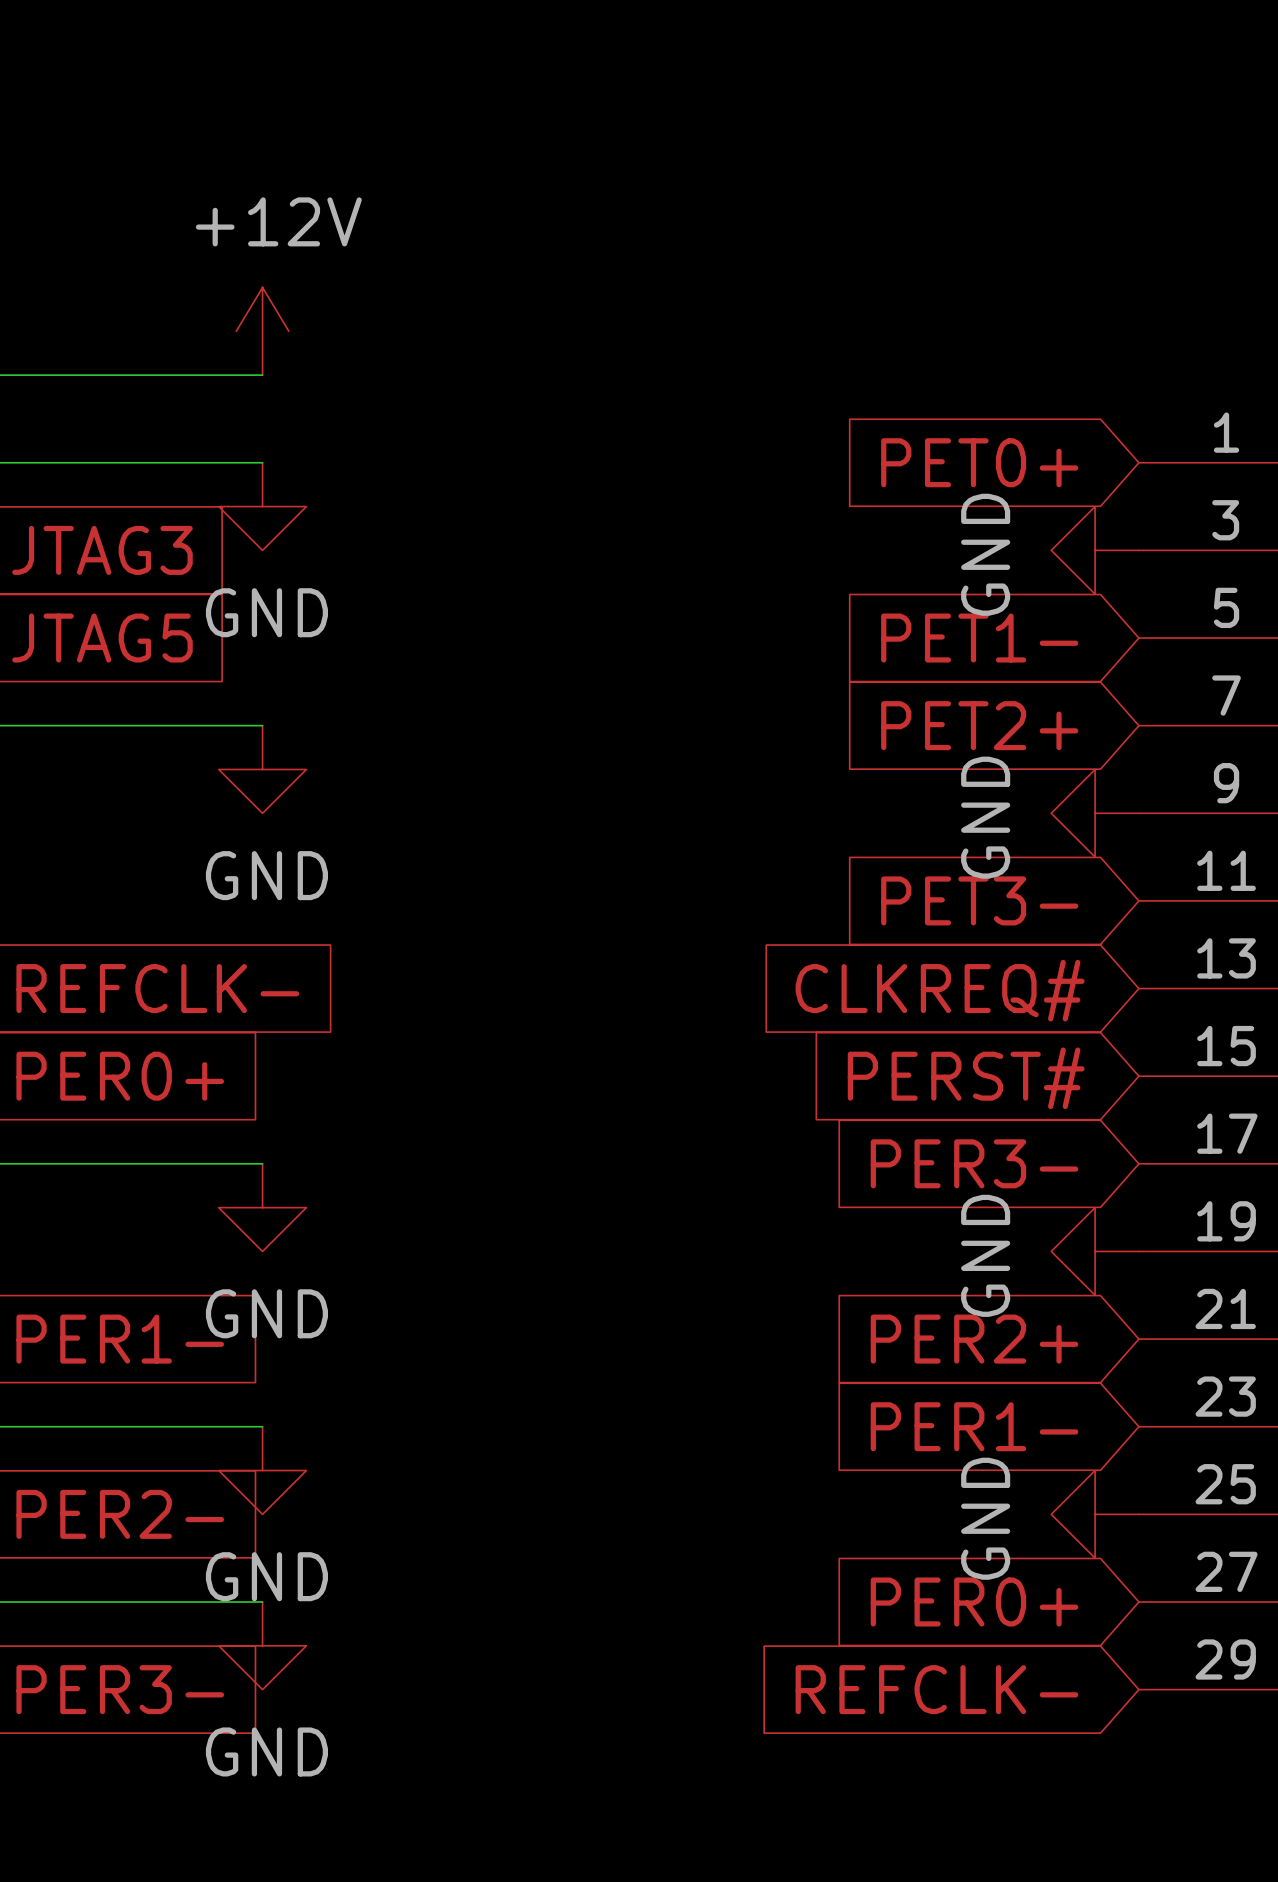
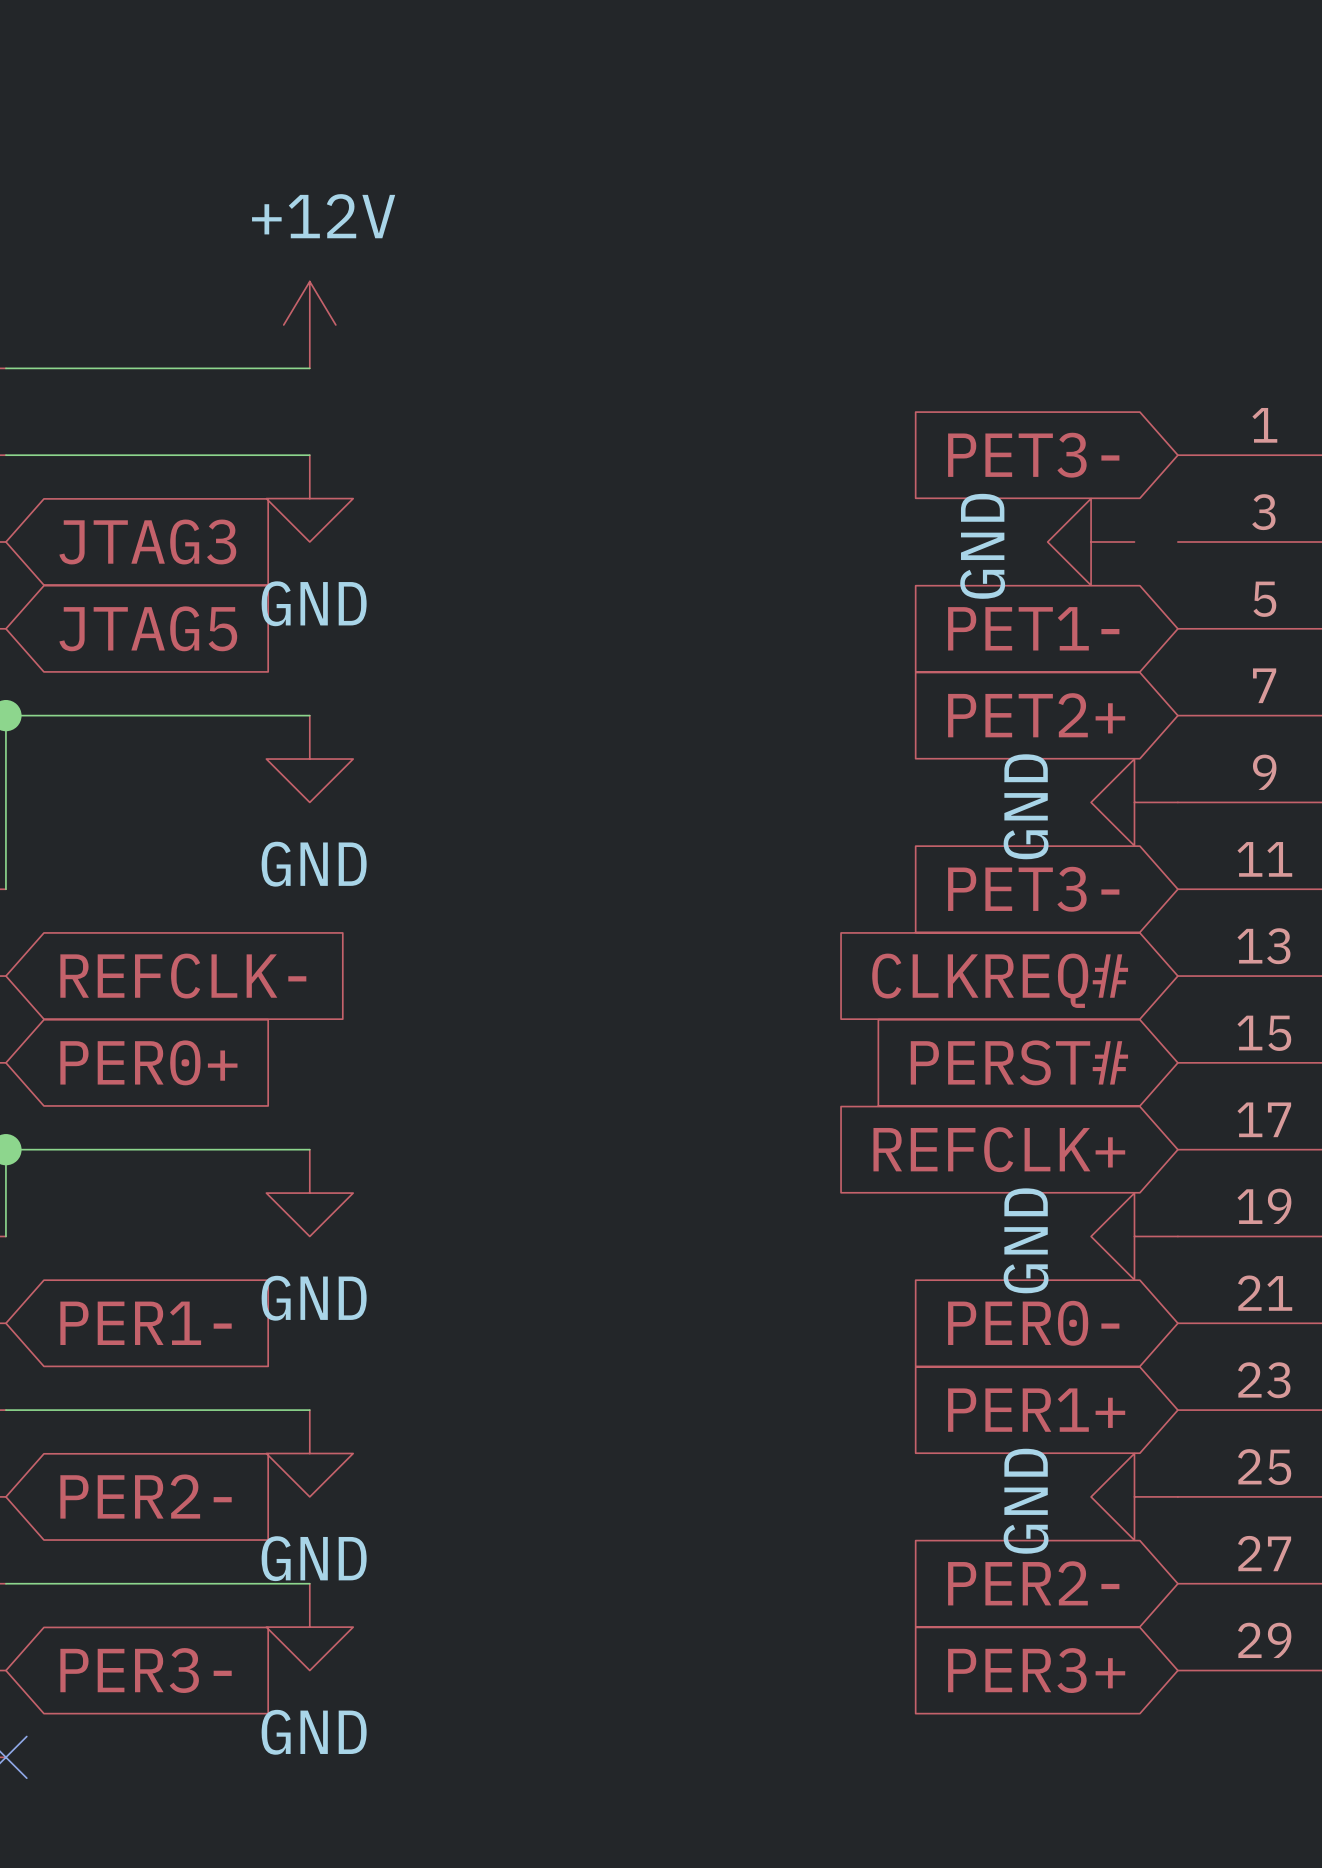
global label: PET0+ (979, 462) -> PET3- (1033, 455)
power symbol position: GND (1095, 550) -> GND (1091, 542)
global label: PER3- (974, 1163) -> REFCLK+ (999, 1149)
global label: PER2+ (974, 1339) -> PER0- (1033, 1323)
global label: PER1- (974, 1426) -> PER1+ (1036, 1410)
global label: PER0+ (974, 1601) -> PER2- (1033, 1583)
global label: REFCLK- (936, 1689) -> PER3+ (1036, 1670)

